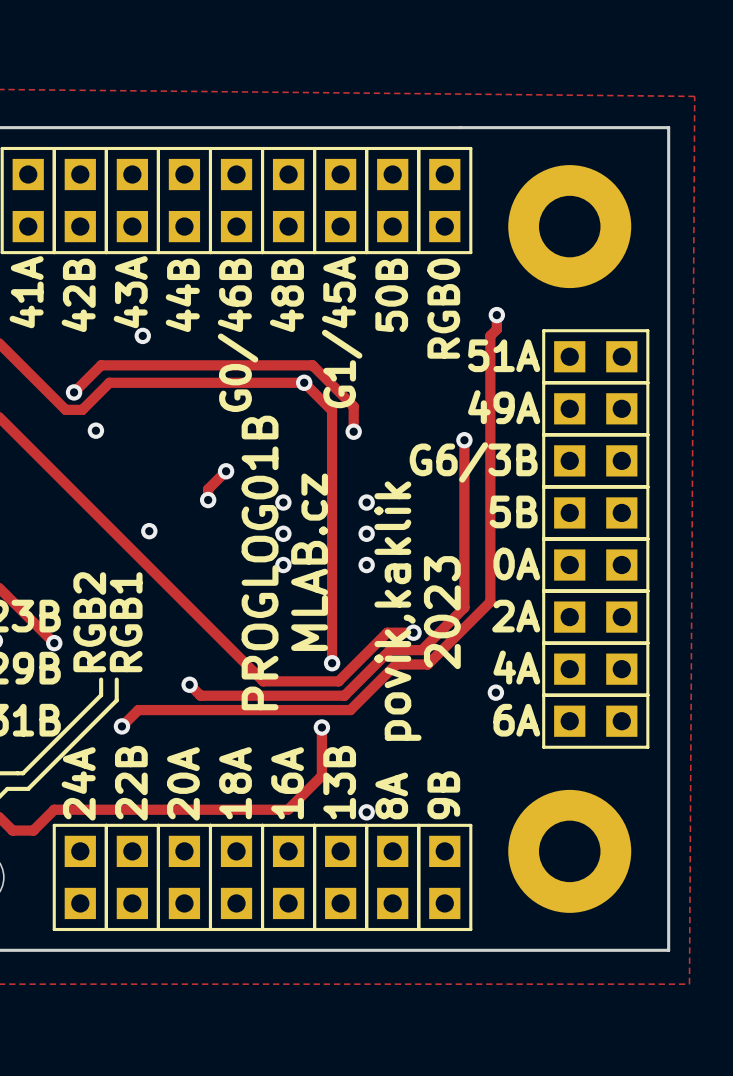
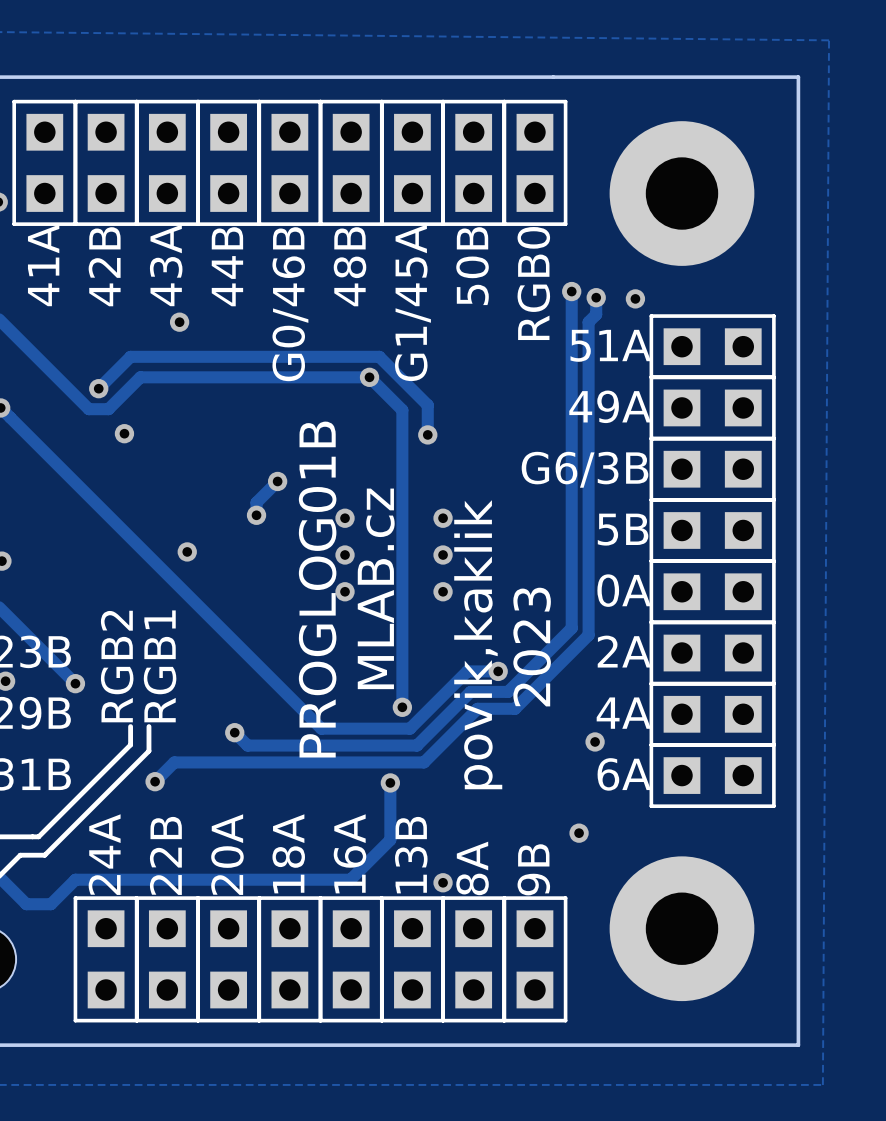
via: none -> (571, 291)
via: none -> (635, 298)
track: (464, 440) (464, 607) -> (571, 291) (571, 628) (558, 641)
via: (464, 440) -> none
via: none -> (579, 833)

